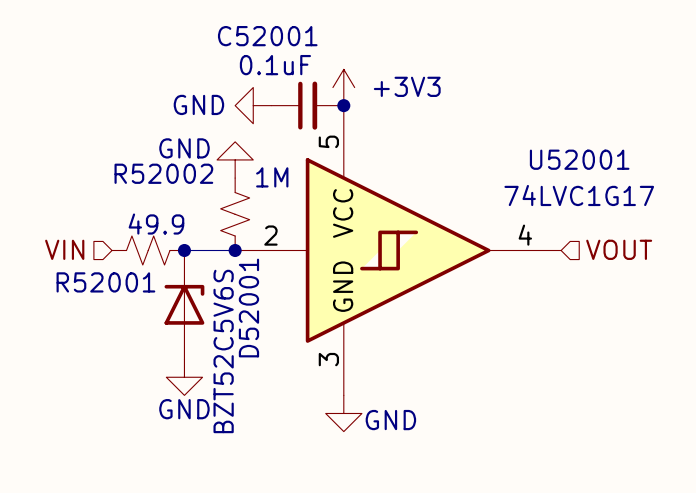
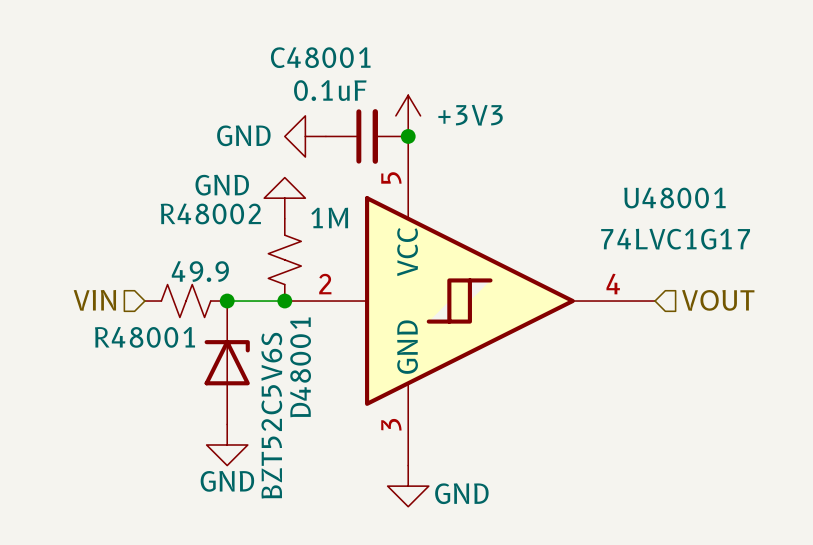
C52001 name: C52001 (267, 36) -> C48001 (320, 57)
U52001 name: U52001 (579, 159) -> U48001 (674, 198)
R52002 name: R52002 (163, 173) -> R48002 (210, 213)
R52001 name: R52001 (105, 282) -> R48001 (144, 337)
D52001 name: D52001 (248, 308) -> D48001 (300, 367)

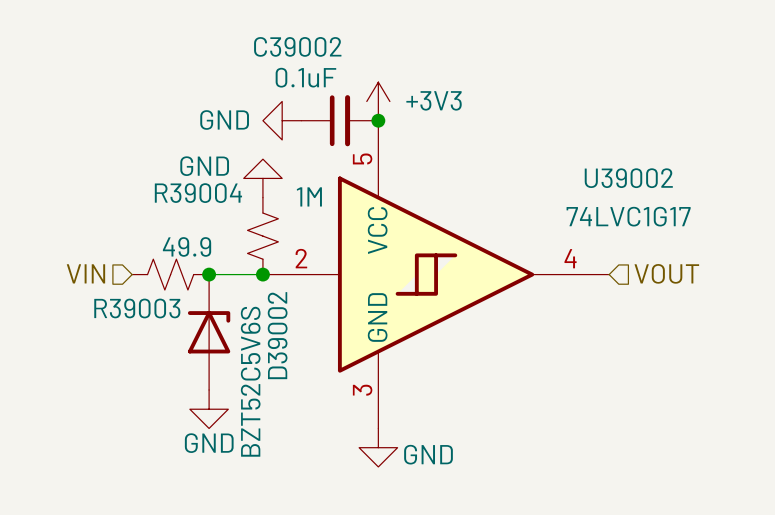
C48001 name: C48001 (320, 57) -> C39002 (297, 46)
U48001 name: U48001 (674, 198) -> U39002 (628, 178)
R48002 name: R48002 (210, 213) -> R39004 (198, 193)
R48001 name: R48001 (144, 337) -> R39003 (137, 308)
D48001 name: D48001 (300, 367) -> D39002 (277, 335)

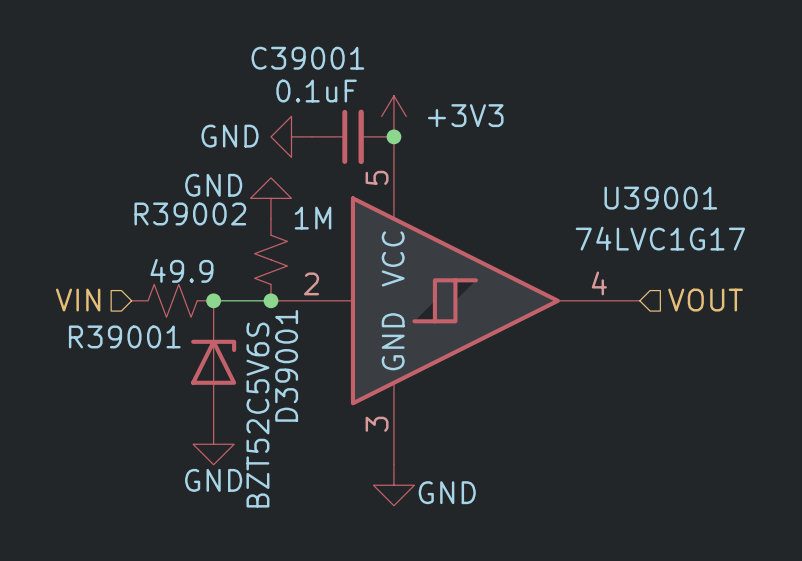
C39002 name: C39002 (297, 46) -> C39001 (307, 58)
U39002 name: U39002 (628, 178) -> U39001 (660, 198)
R39004 name: R39004 (198, 193) -> R39002 (190, 213)
R39003 name: R39003 (137, 308) -> R39001 (124, 336)
D39002 name: D39002 (277, 335) -> D39001 (286, 365)

